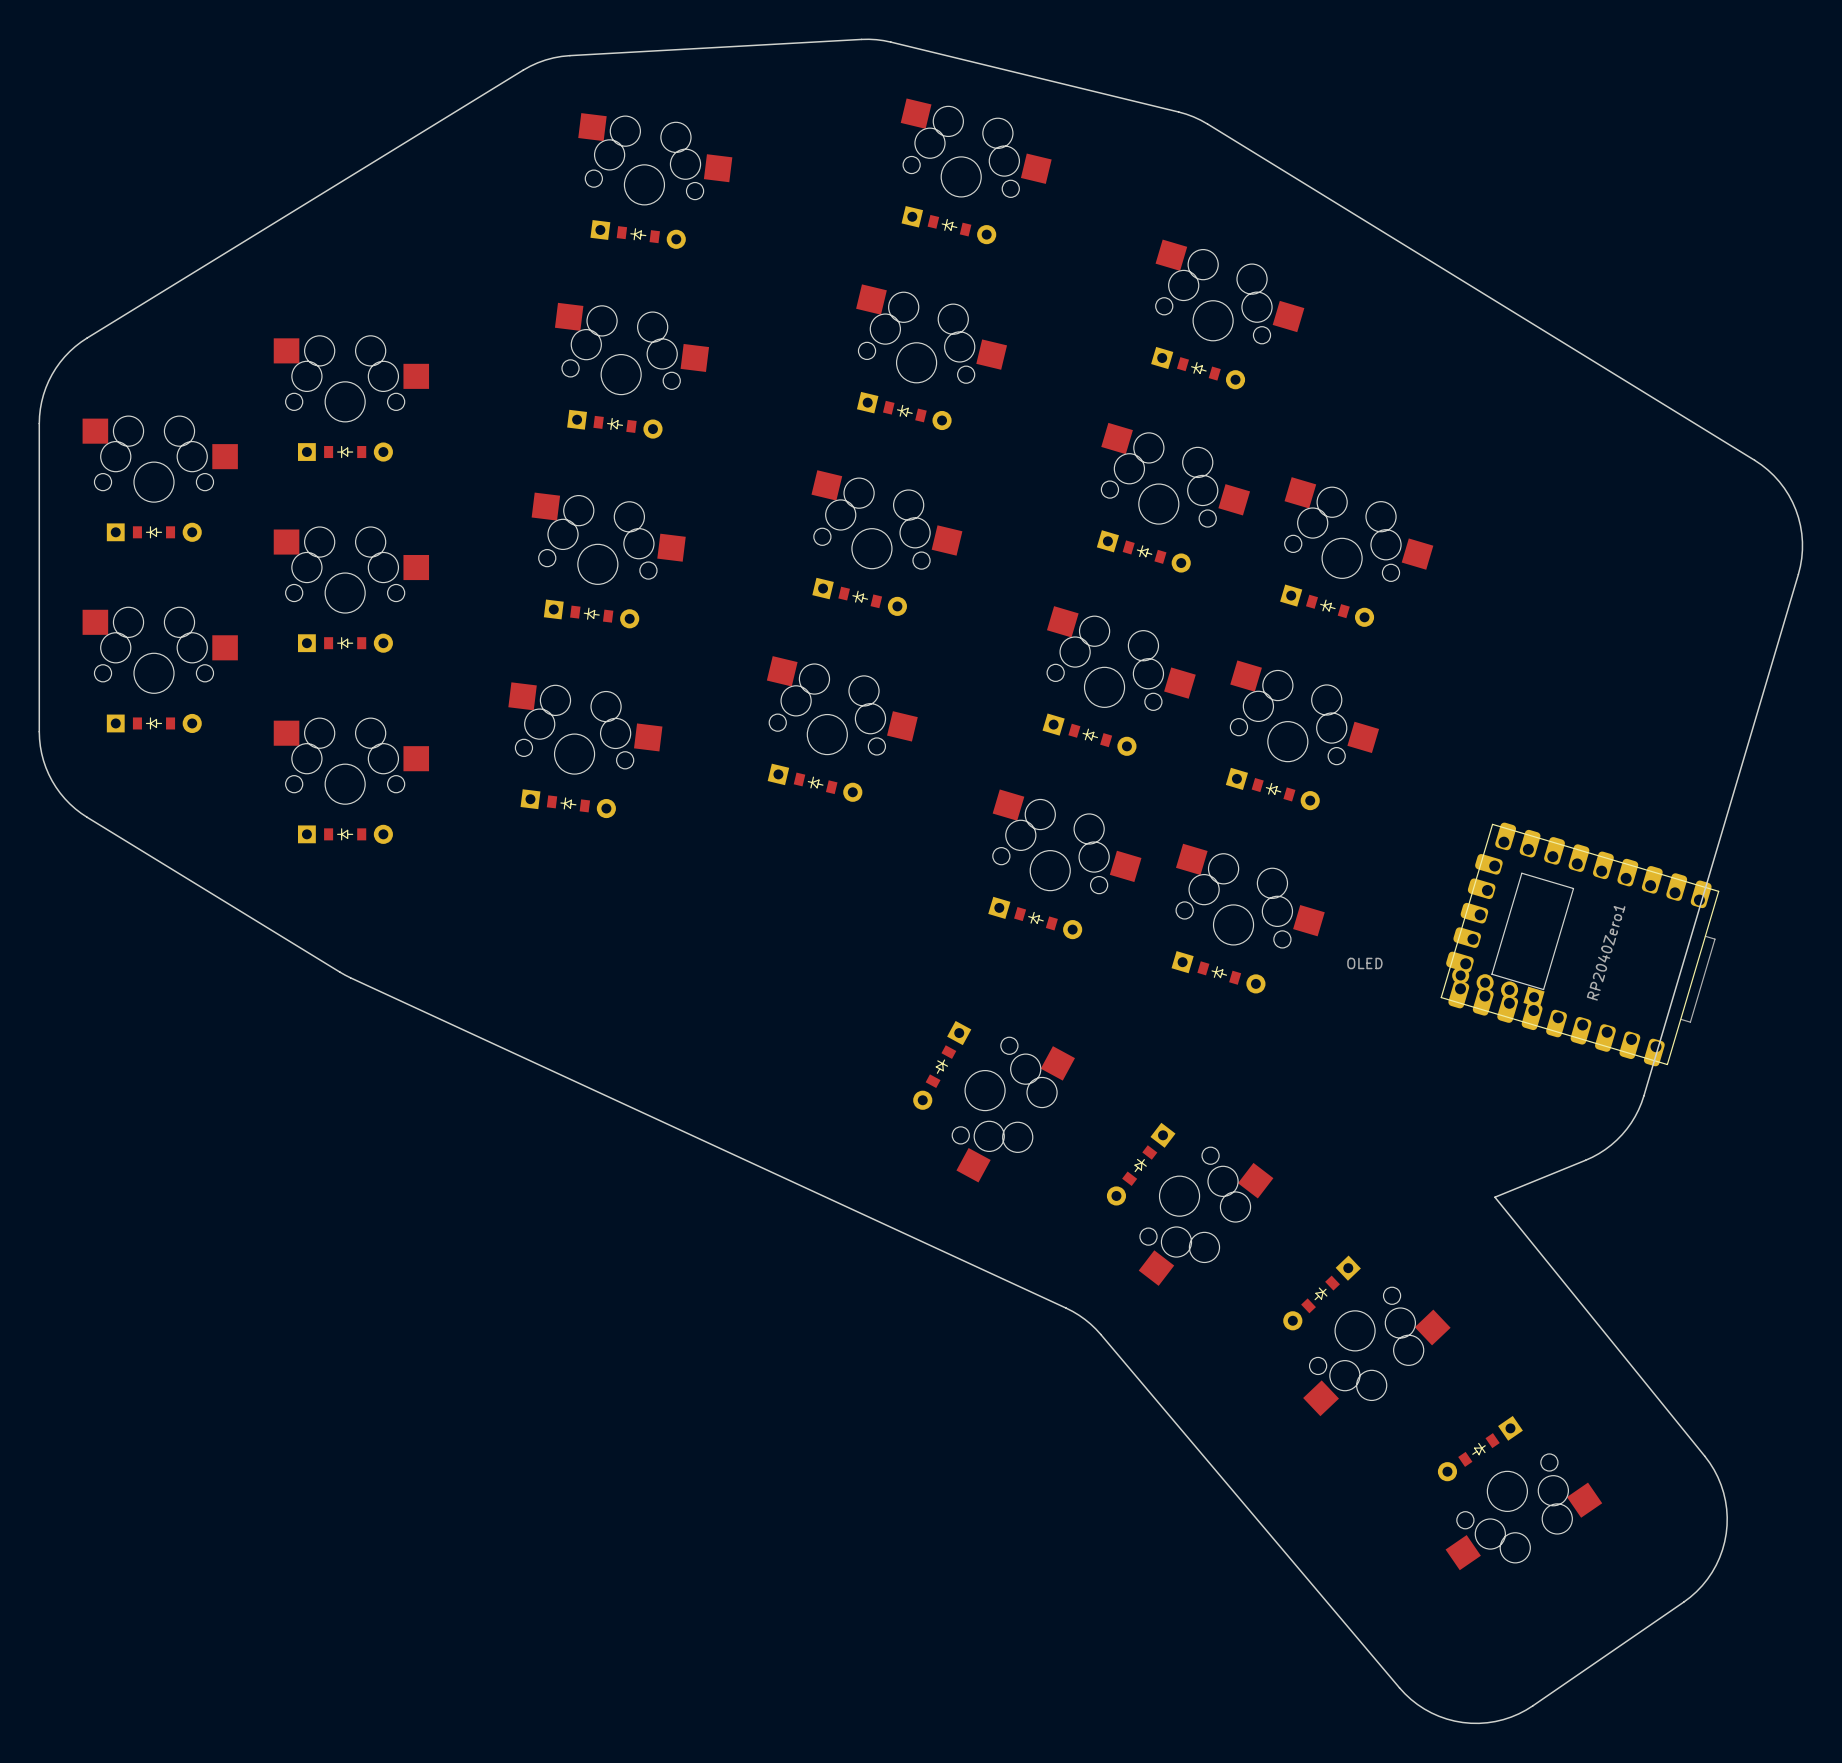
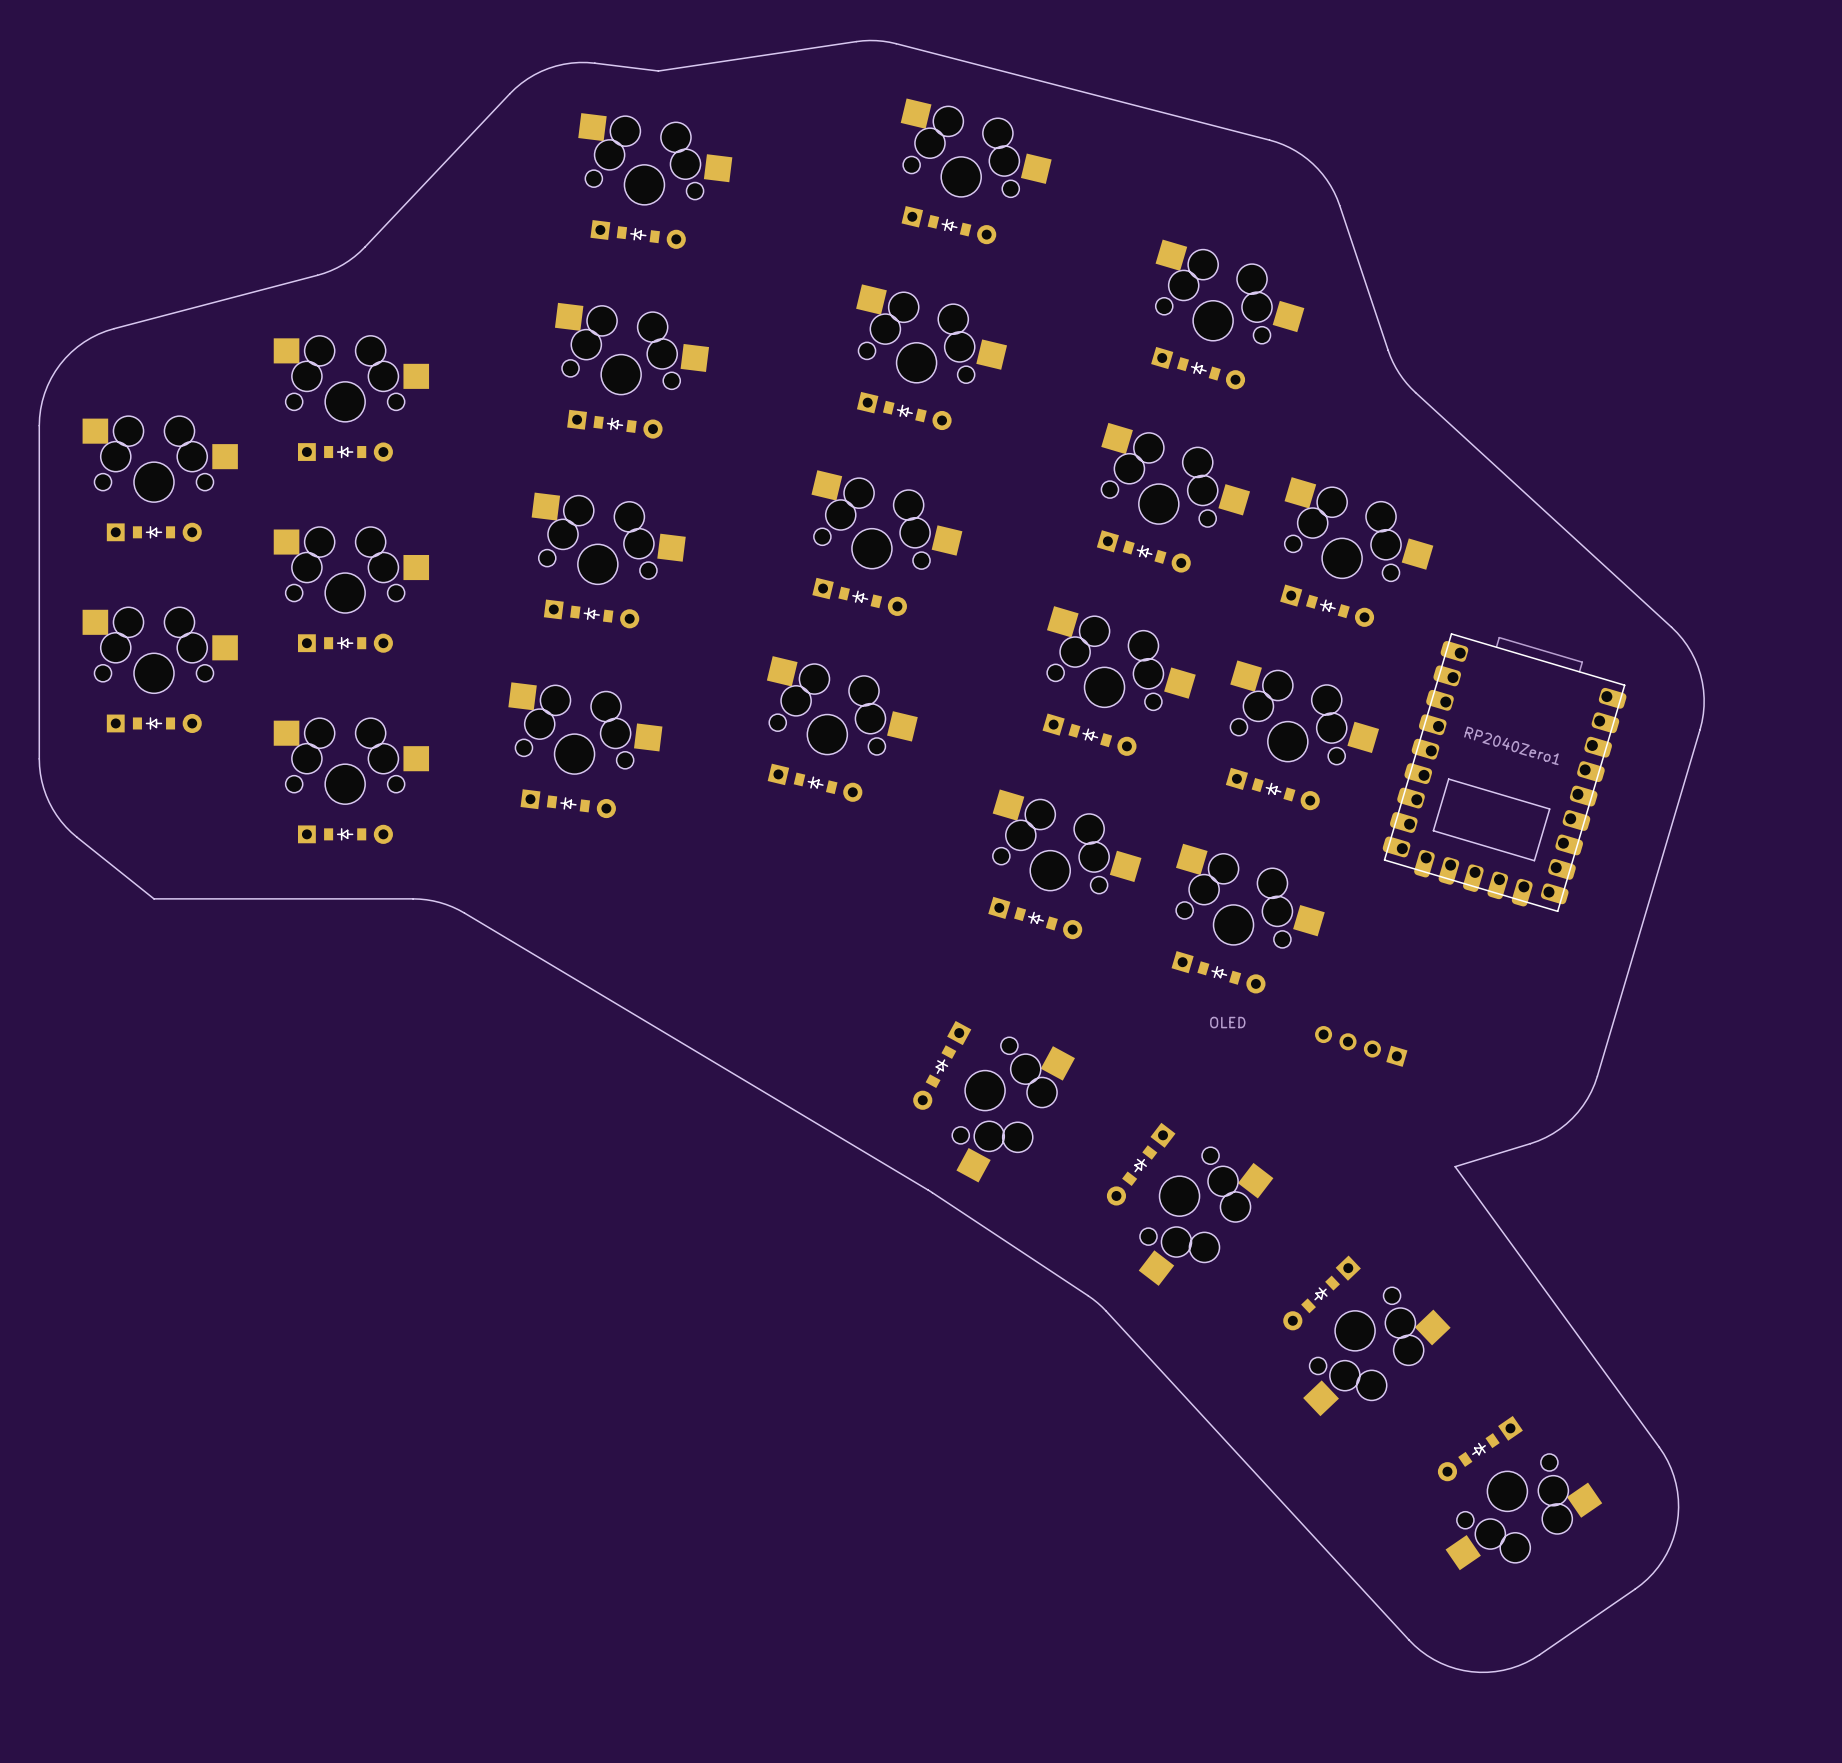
board edge: (39, 425) (41, 401) (48, 381) (60, 362) (81, 342) (530, 66) (553, 57) (569, 55) (869, 39) (890, 42) (1178, 112) (1200, 120) (1761, 464) (1779, 481) (1795, 509) (1802, 541) (1800, 566) (1641, 1102) (1626, 1129) (1611, 1145) (1598, 1153) (1494, 1197) (1714, 1469) (1723, 1492) (1727, 1517) (1724, 1541) (1716, 1565) (1702, 1585) (1690, 1597) (1518, 1713) (1495, 1721) (1479, 1723) (1454, 1721) (1431, 1712) (1411, 1699) (1399, 1687) (1100, 1334) (1078, 1315) (345, 975) (75, 808) (60, 793) (48, 774) (41, 753) (39, 731) -> (39, 425) (42, 401) (51, 378) (65, 358) (84, 342) (114, 328) (317, 275) (343, 264) (364, 247) (515, 88) (534, 74) (563, 64) (587, 62) (658, 71) (856, 41) (883, 41) (1269, 140) (1283, 144) (1301, 154) (1322, 174) (1337, 198) (1388, 350) (1402, 378) (1415, 392) (1677, 632) (1691, 652) (1700, 674) (1704, 706) (1700, 729) (1591, 1091) (1572, 1118) (1553, 1133) (1530, 1143) (1455, 1166) (1667, 1461) (1675, 1483) (1678, 1507) (1675, 1531) (1666, 1553) (1658, 1567) (1641, 1584) (1525, 1662) (1503, 1670) (1479, 1672) (1463, 1670) (1441, 1663) (1420, 1650) (1409, 1640) (1106, 1311) (1087, 1295) (928, 1190) (452, 906) (433, 900) (413, 898) (153, 898) (76, 837) (56, 815) (49, 802) (41, 781) (39, 731)
RP2040Zero1 rotation: 0° (1579, 944) -> 90° counterclockwise (1504, 772)
RP2040Zero1 position: (1579, 944) -> (1504, 772)
part position: (1498, 987) -> (1361, 1046)

